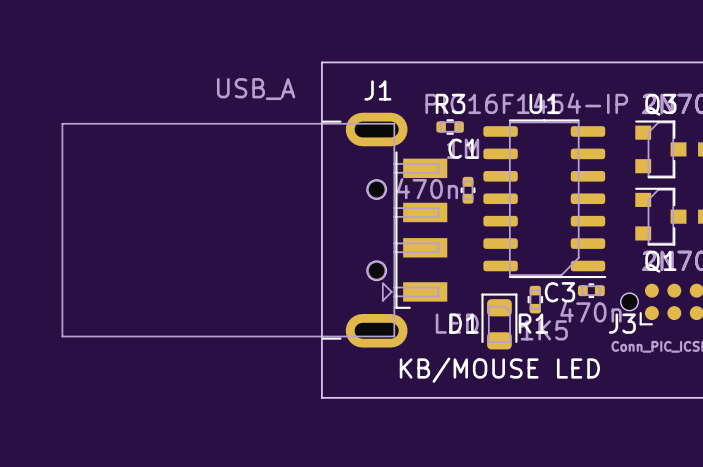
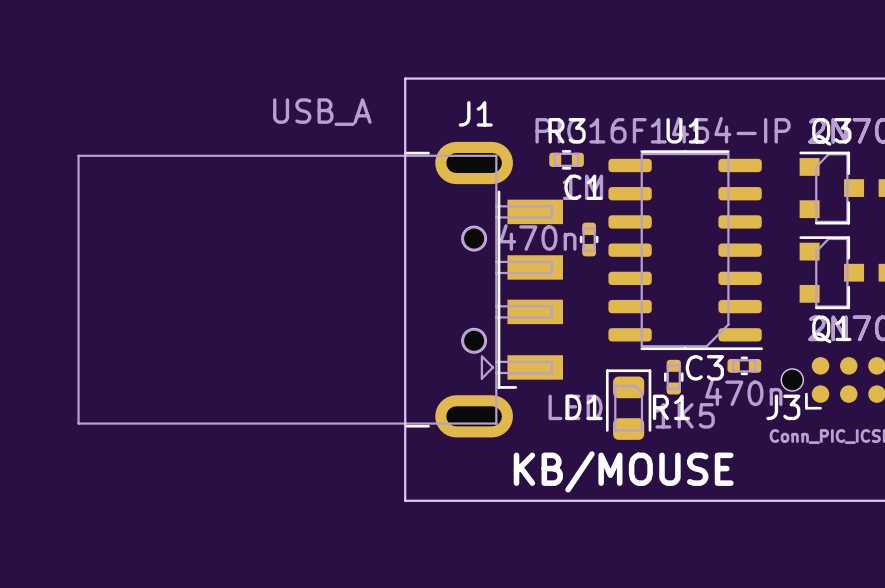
text: KB/MOUSE LED (499, 370) -> KB/MOUSE (623, 471)

